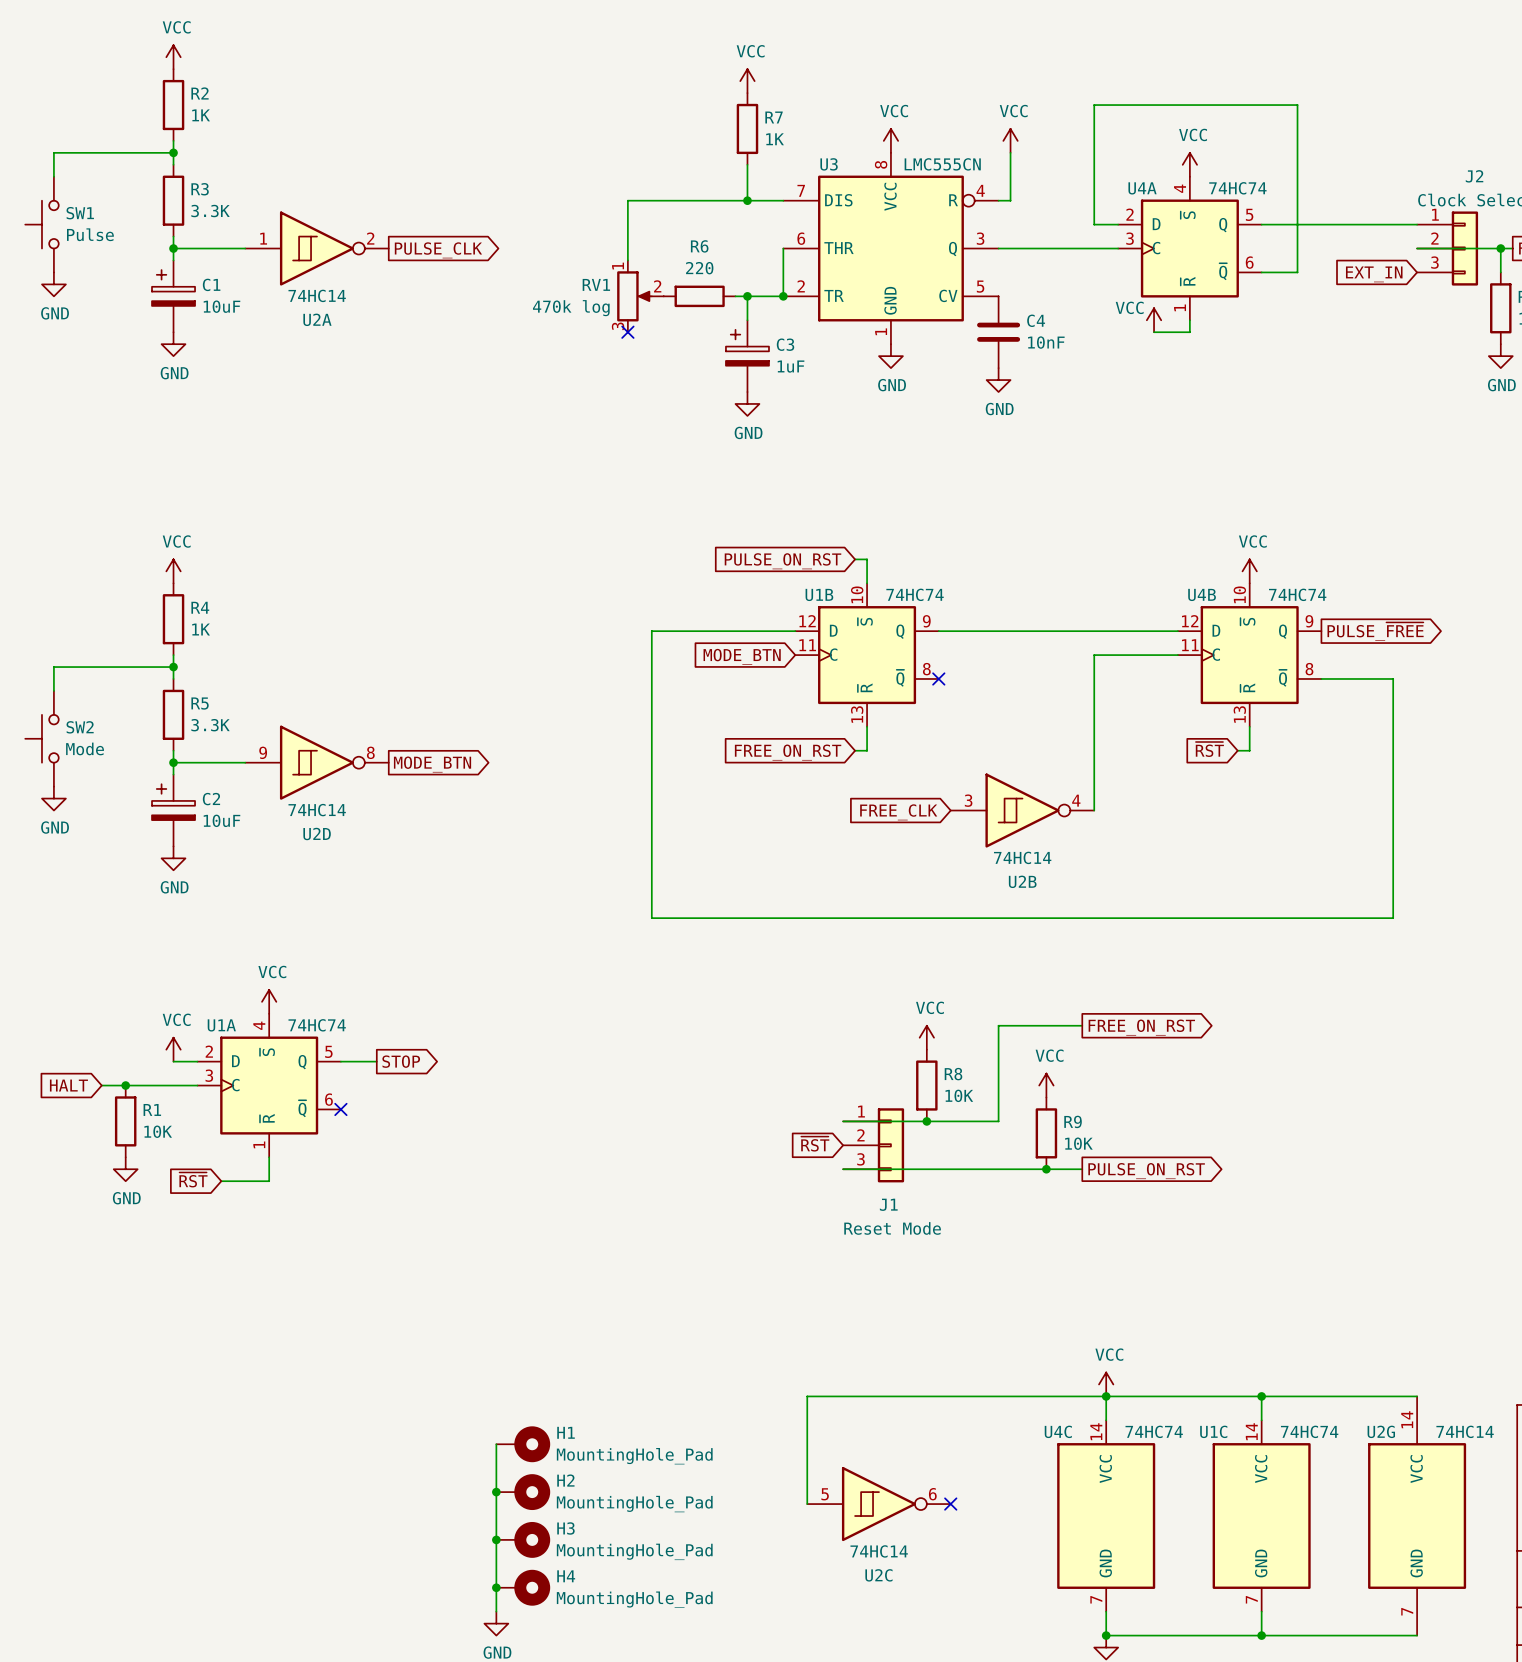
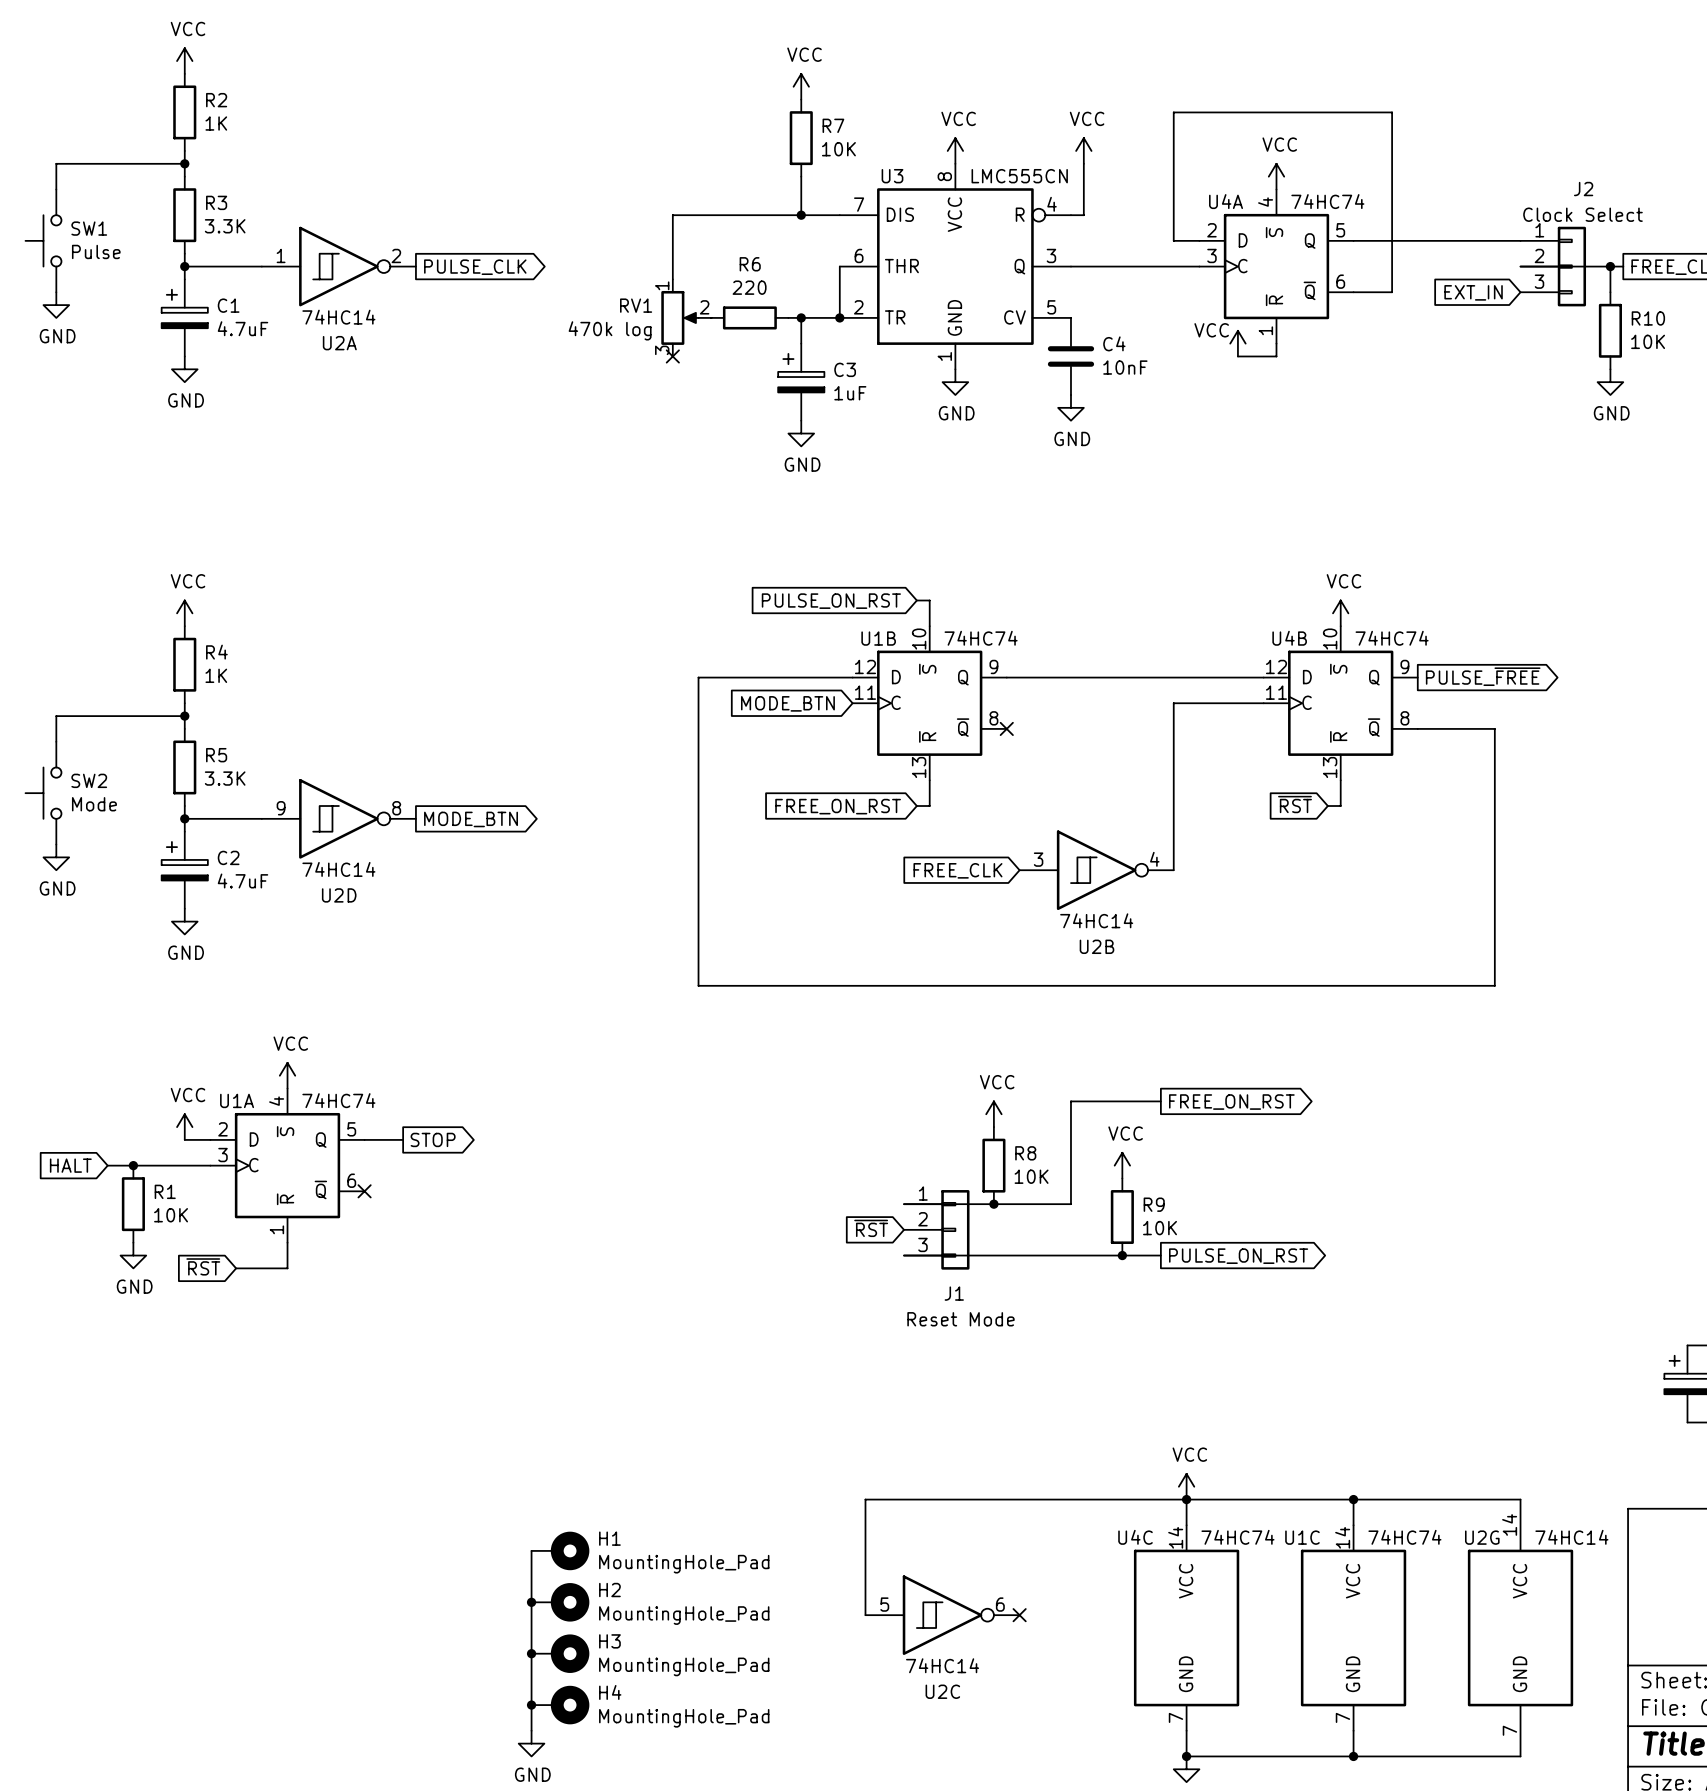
R7 value: 1K (775, 139) -> 10K (838, 149)
C1 value: 10uF (221, 306) -> 4.7uF (243, 328)
C2 value: 10uF (221, 820) -> 4.7uF (243, 881)

